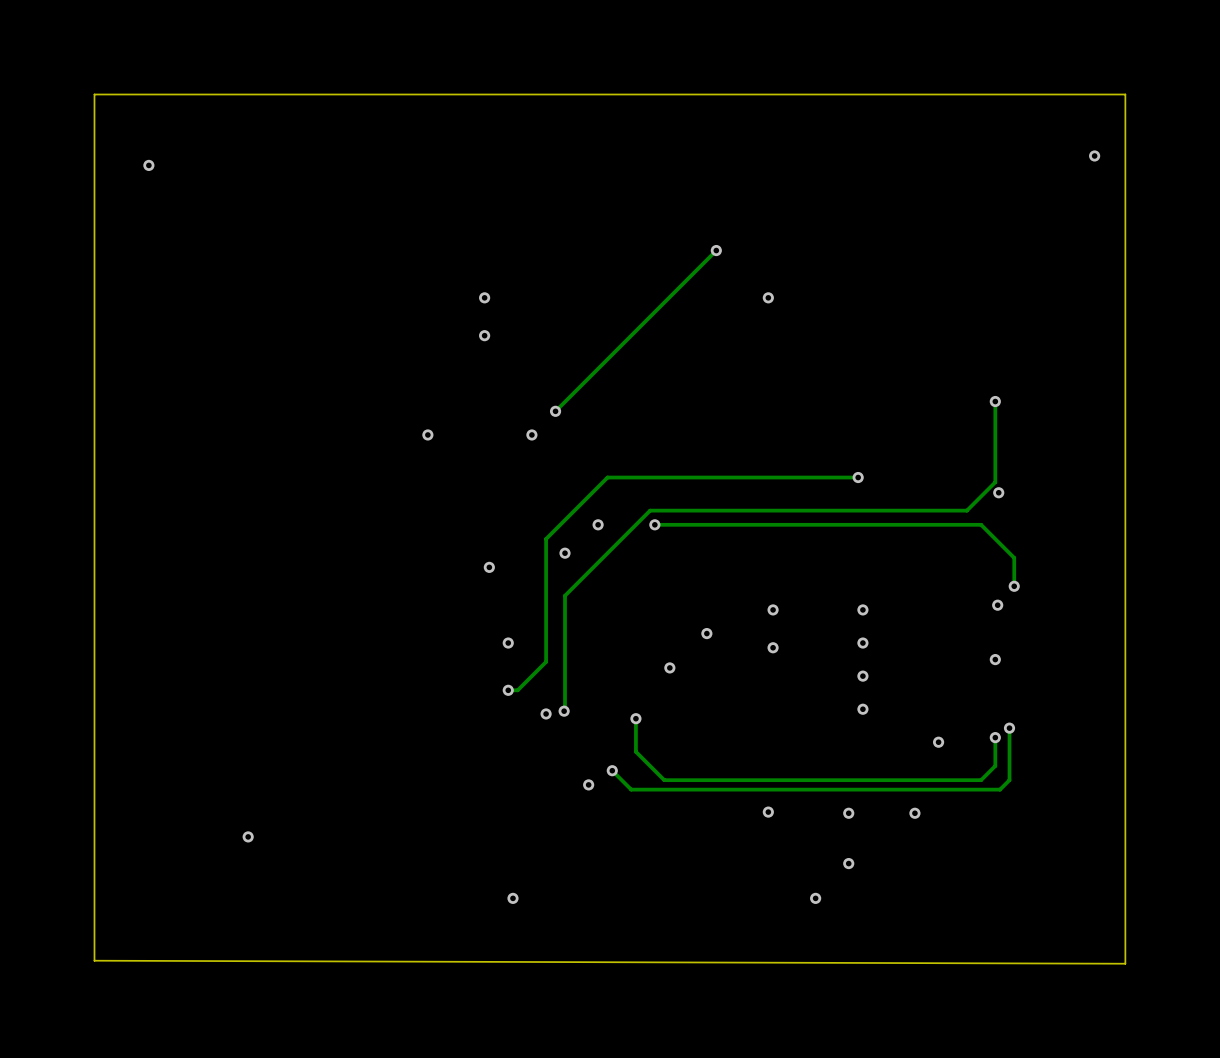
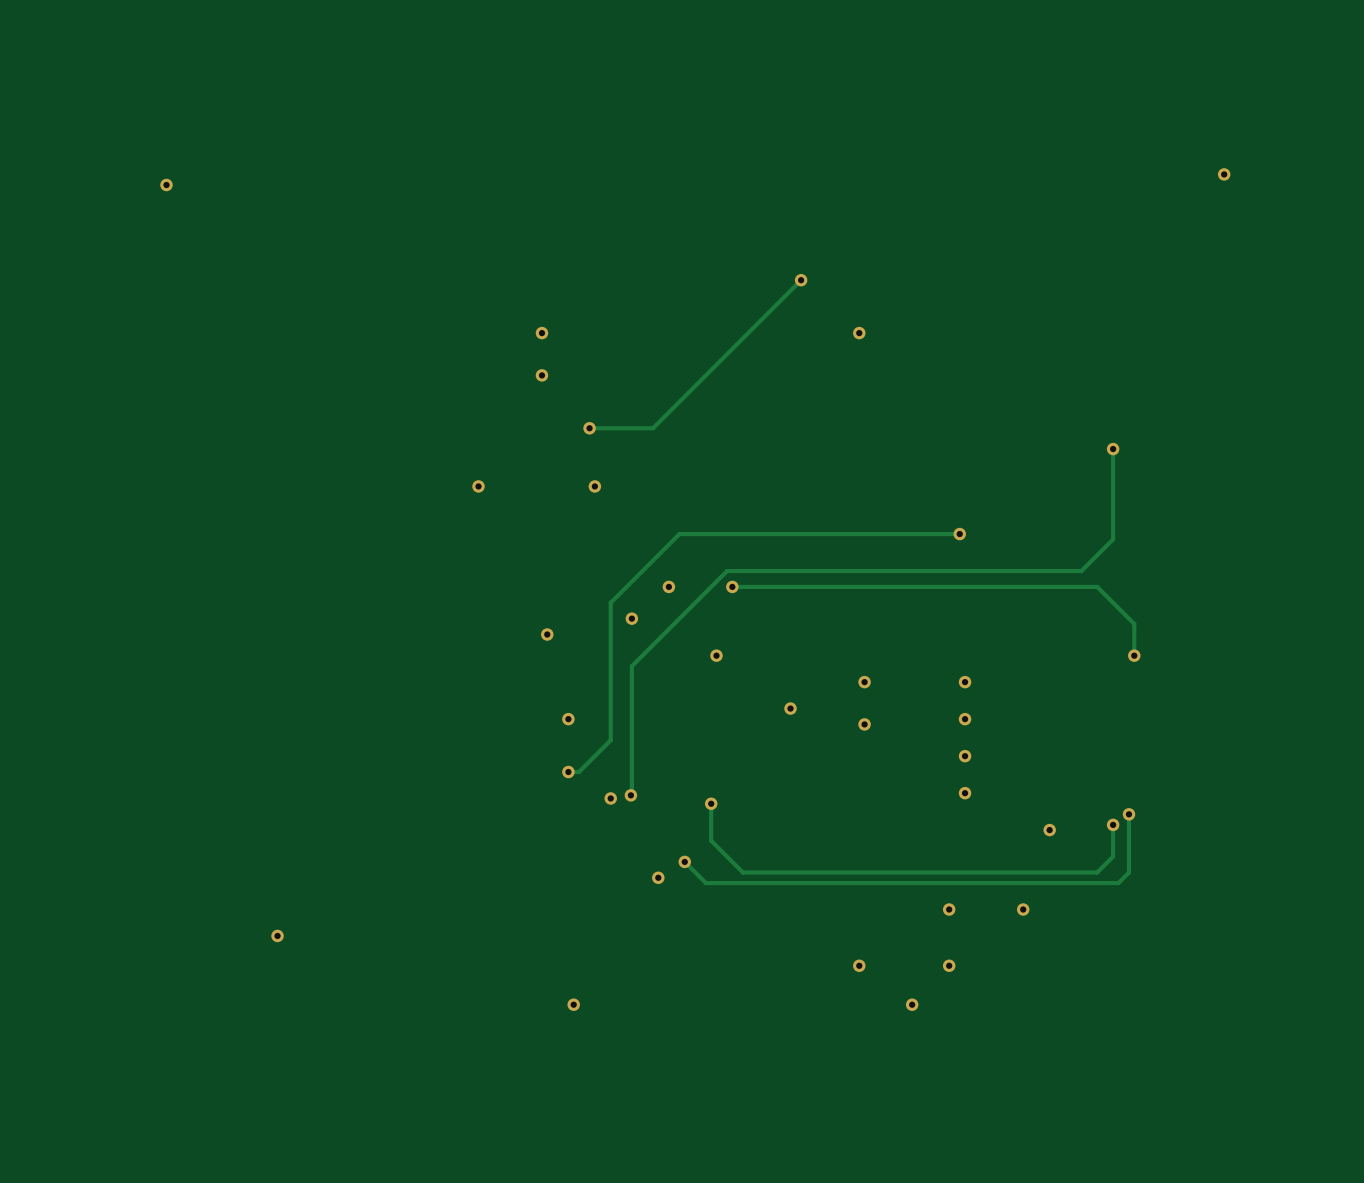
board edge: (1125, 94) (94, 94) (94, 960) (1125, 963) (1125, 94) -> none
track: (583, 382) (555, 411) -> (653, 428) (589, 428)
via position: (555, 411) -> (589, 428)
via: (998, 492) -> none
via: (997, 605) -> none
via: (995, 659) -> none
via position: (669, 667) -> (716, 655)
via position: (768, 812) -> (859, 965)

